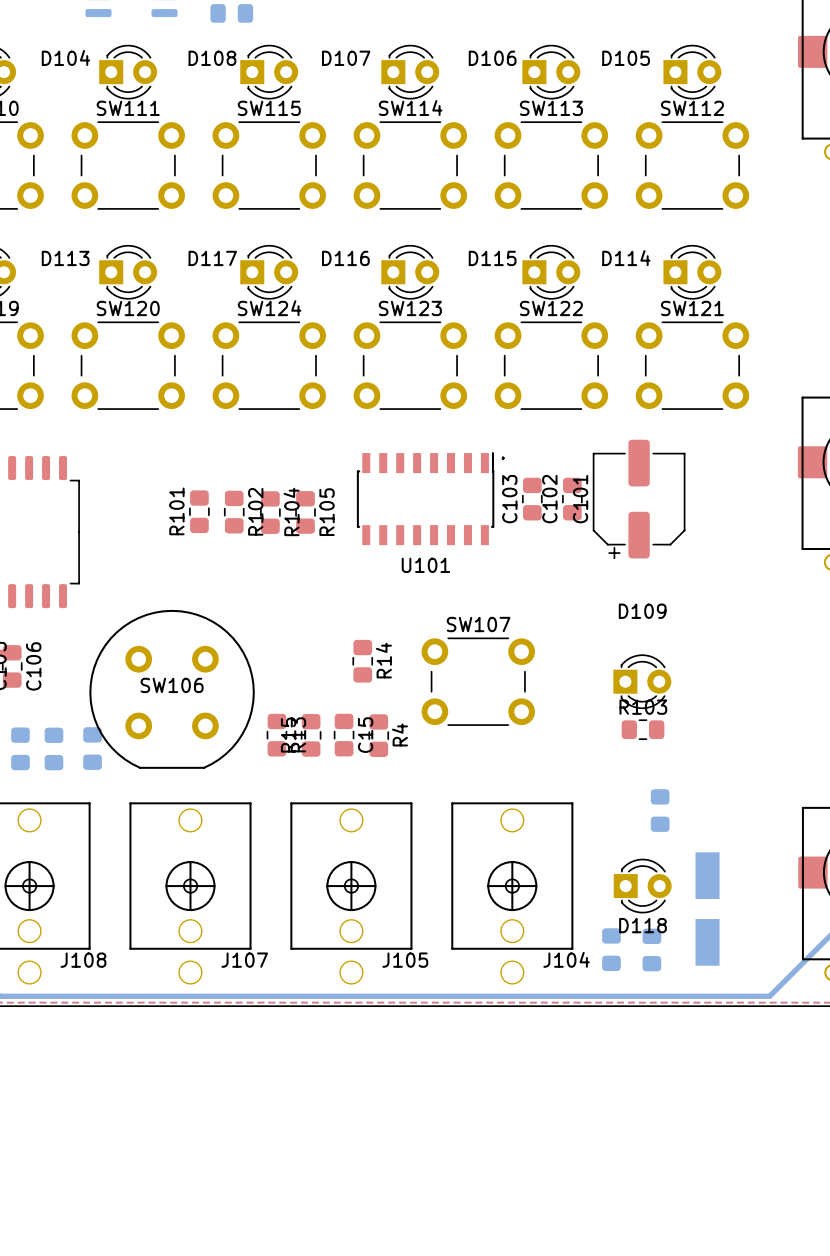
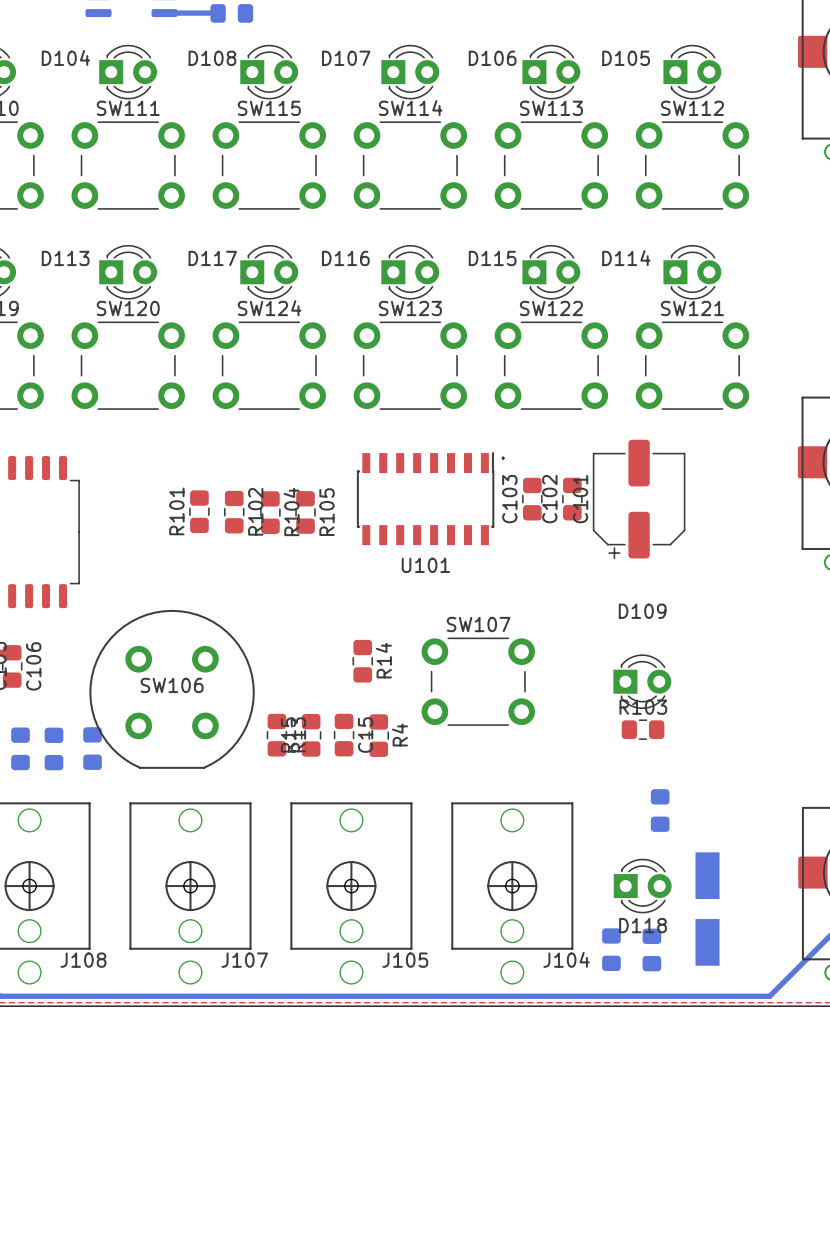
bottom track: none -> (164, 13) (218, 13)

